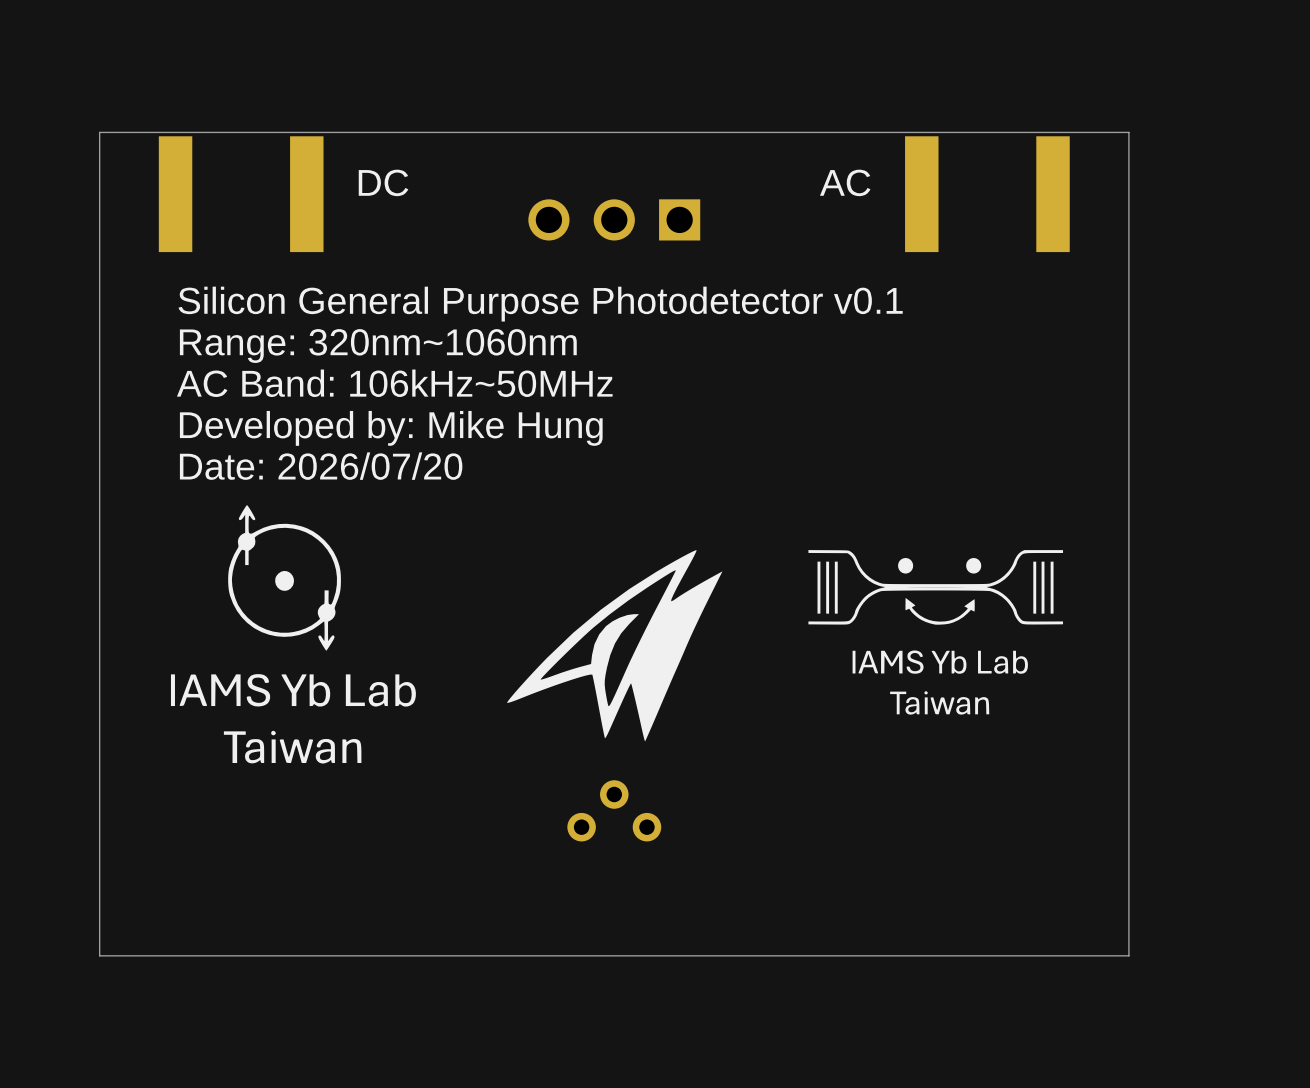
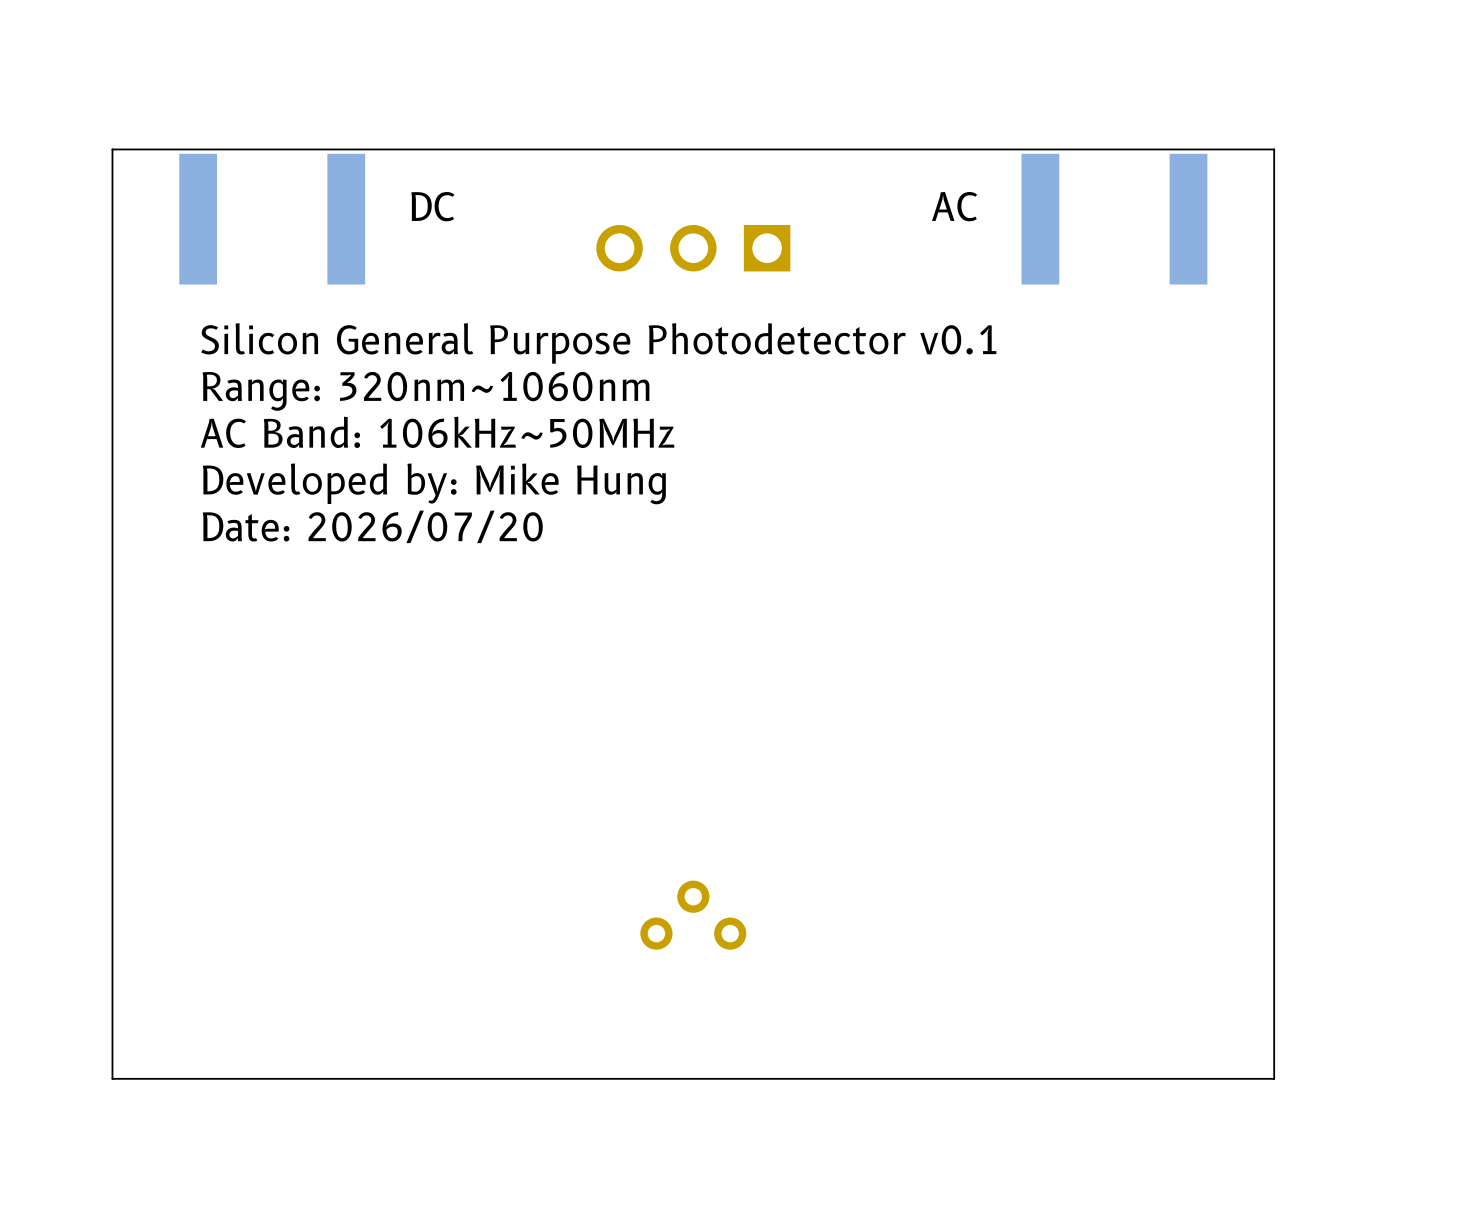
drawing: [170, 505, 416, 764] -> none
drawing: [507, 550, 723, 742] -> none
drawing: [808, 550, 1064, 715] -> none

